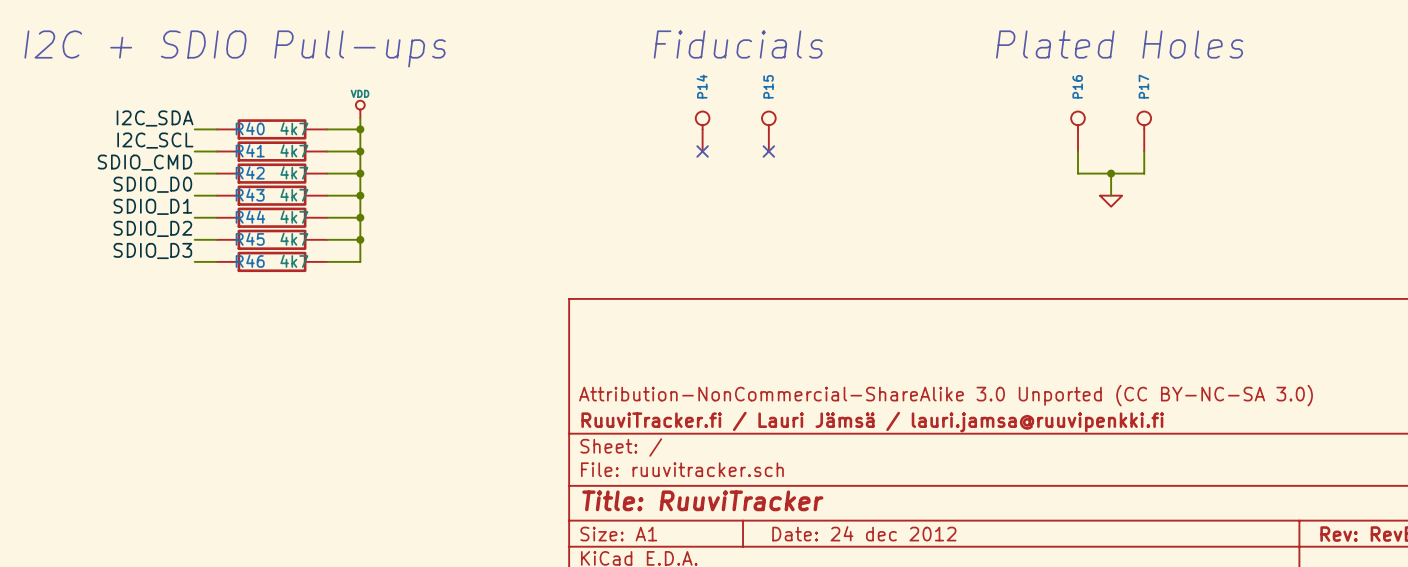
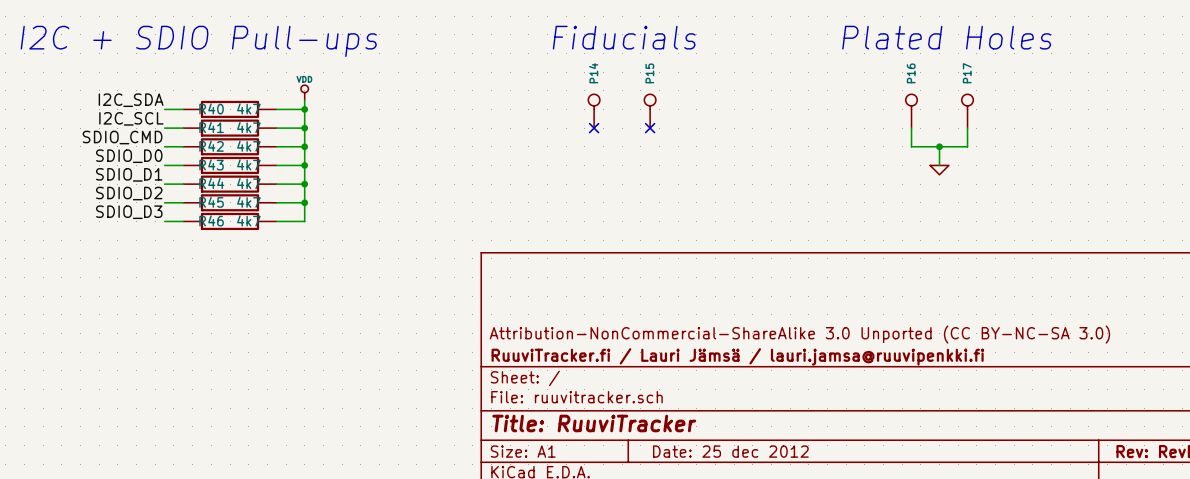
title block: Date: 24 dec 2012 (864, 533) -> Date: 25 dec 2012 (730, 451)

